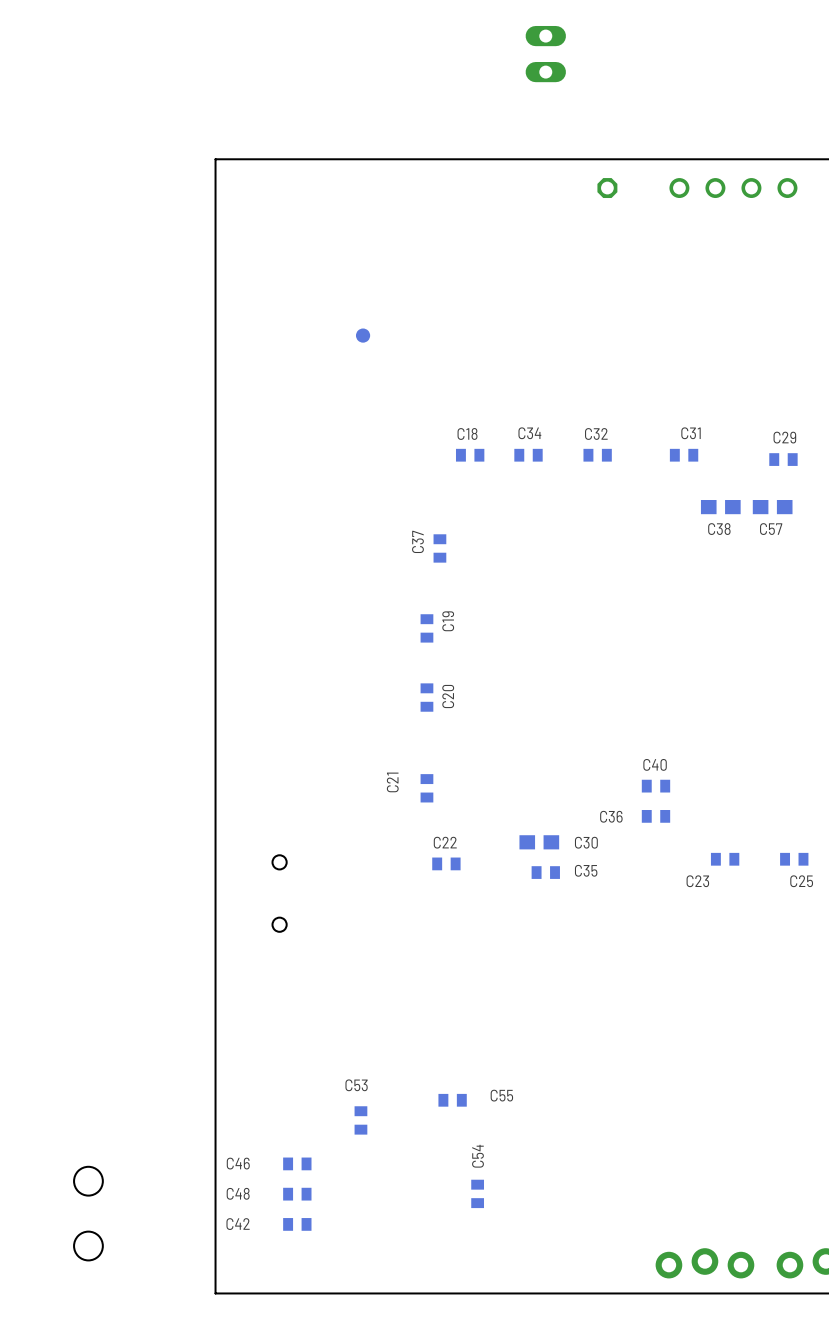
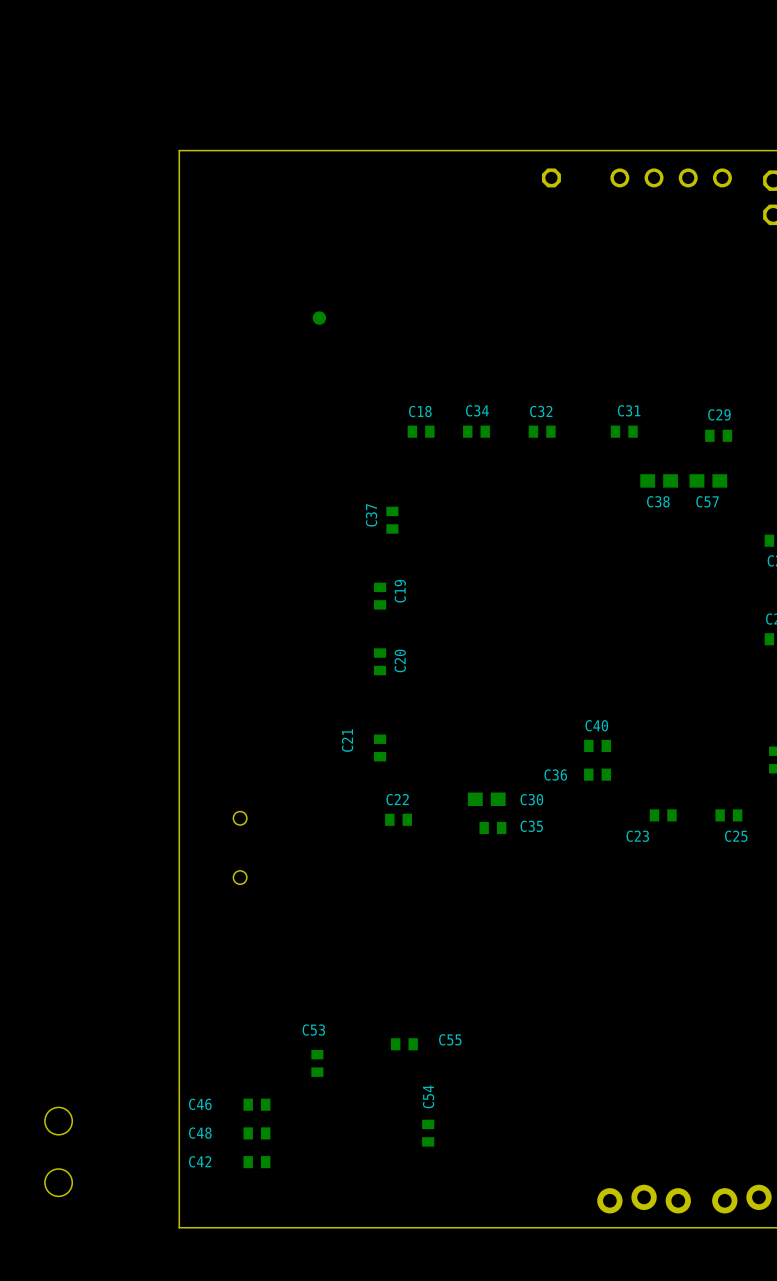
part: (545, 54) -> none

